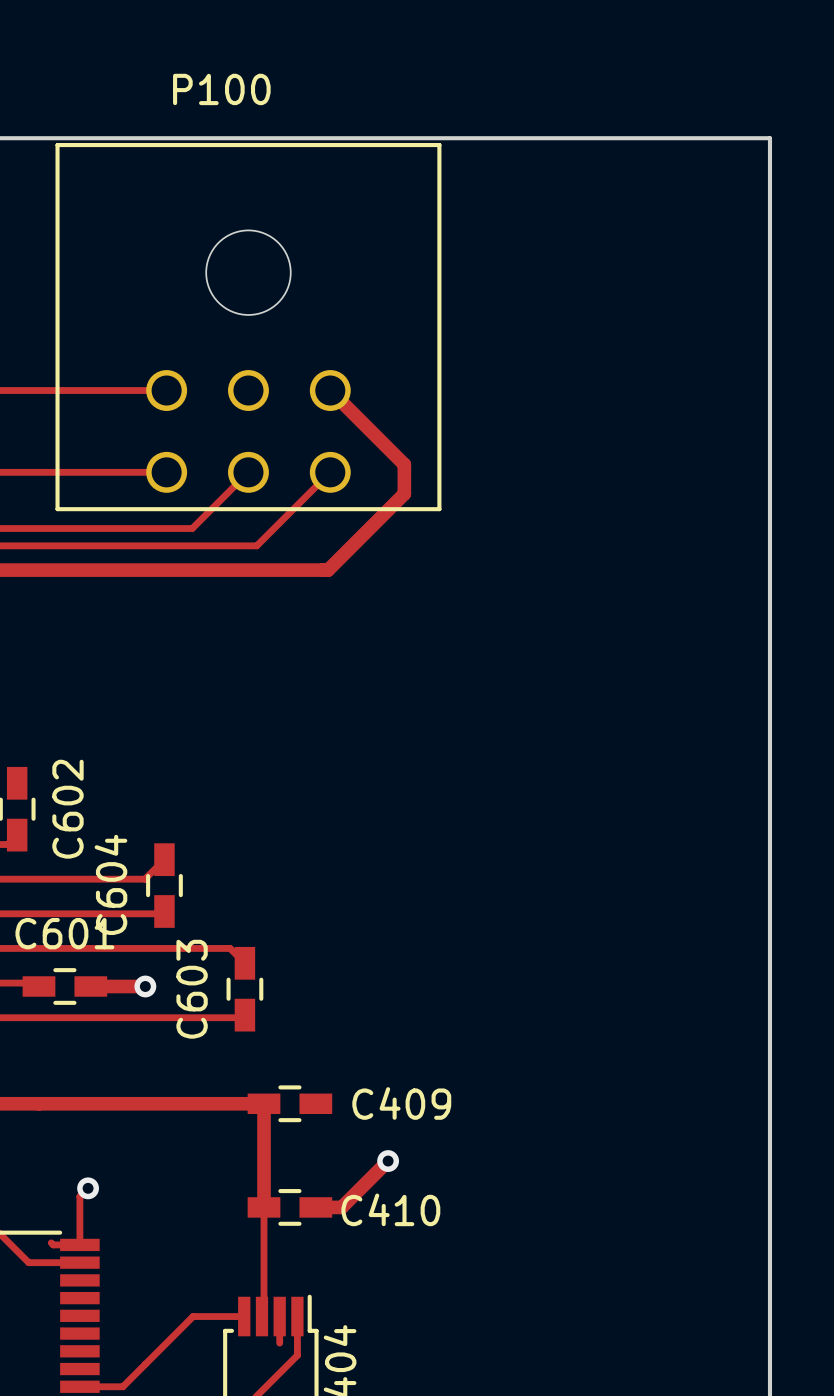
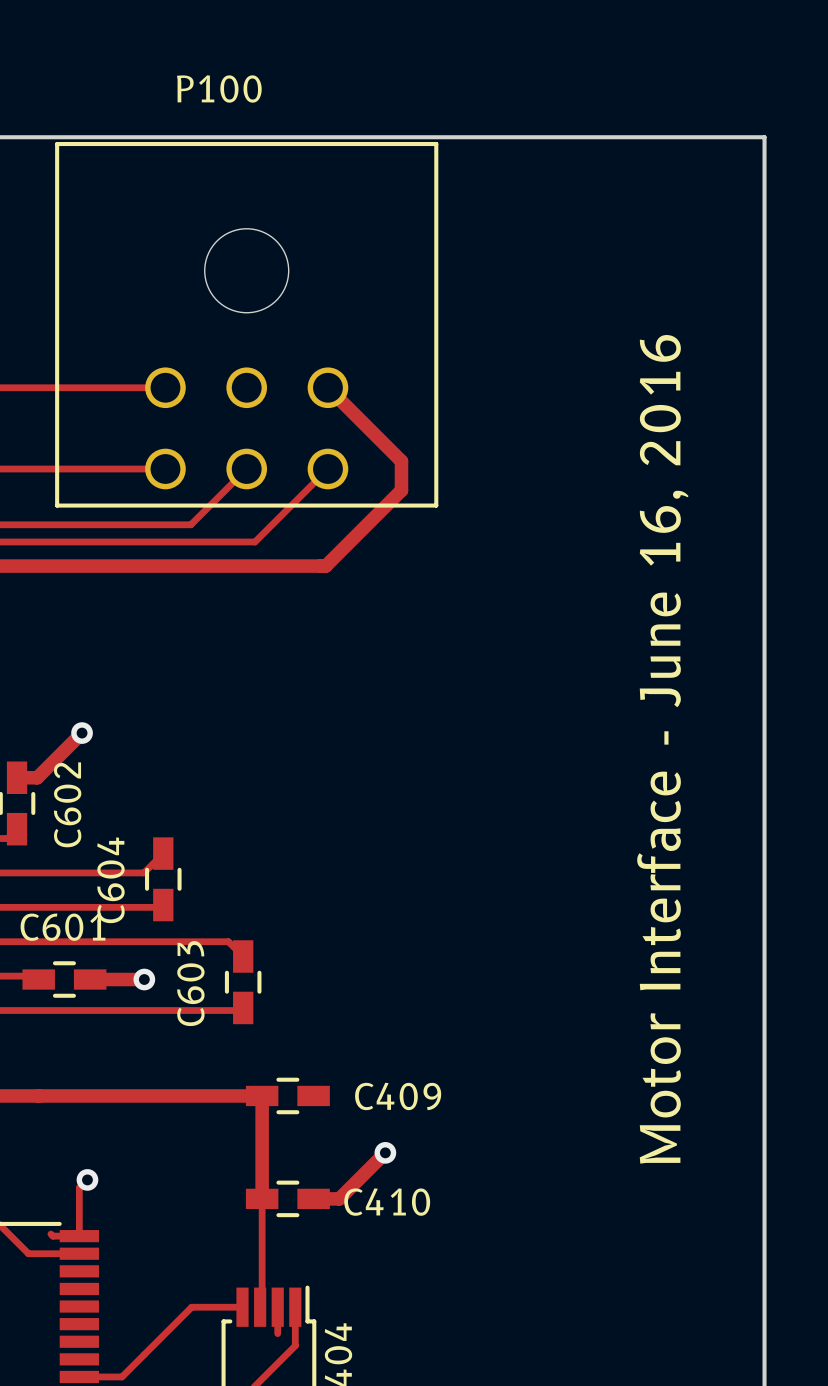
track: none -> (82, 733) (37, 777) (17, 777)
via: none -> (82, 733)
text: none -> Motor Interface - June 16, 2016 (662, 749)

